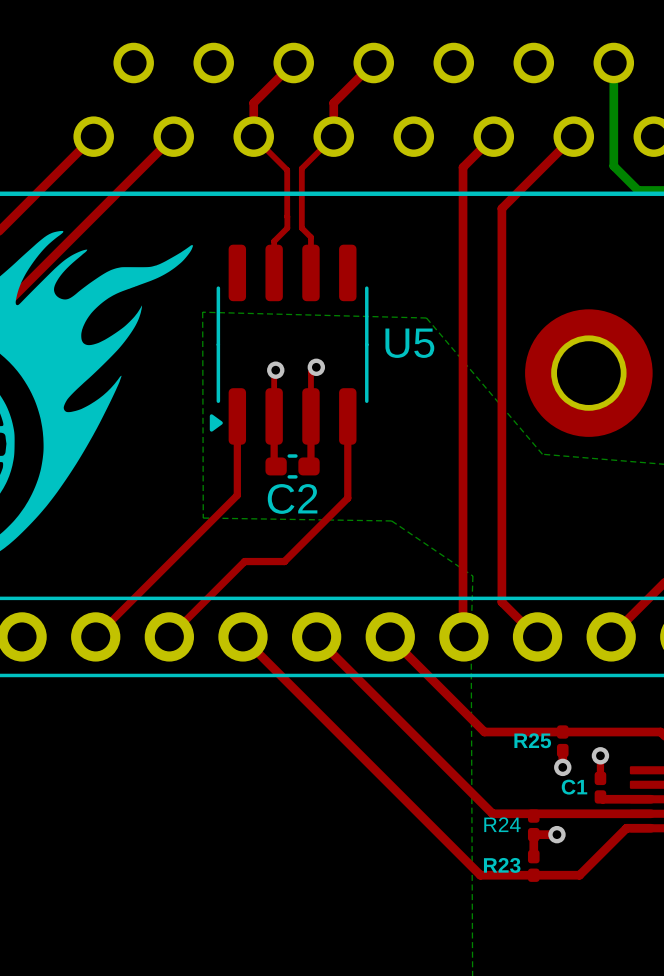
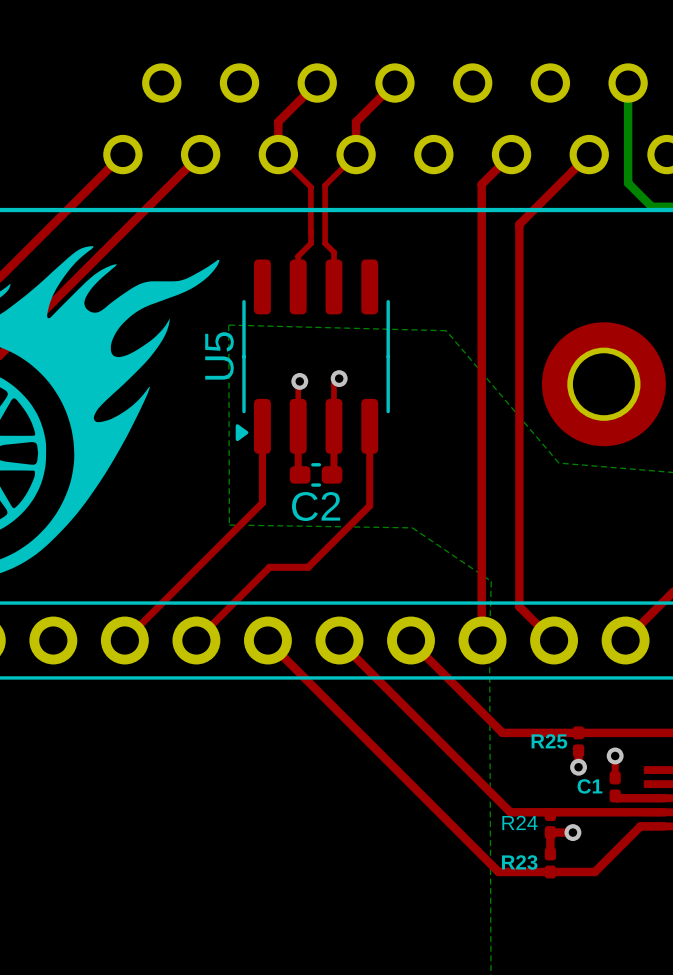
U5 name rotation: 0° (409, 343) -> 90° counterclockwise (219, 355)
U5 name position: U5 (409, 343) -> U5 (219, 355)

